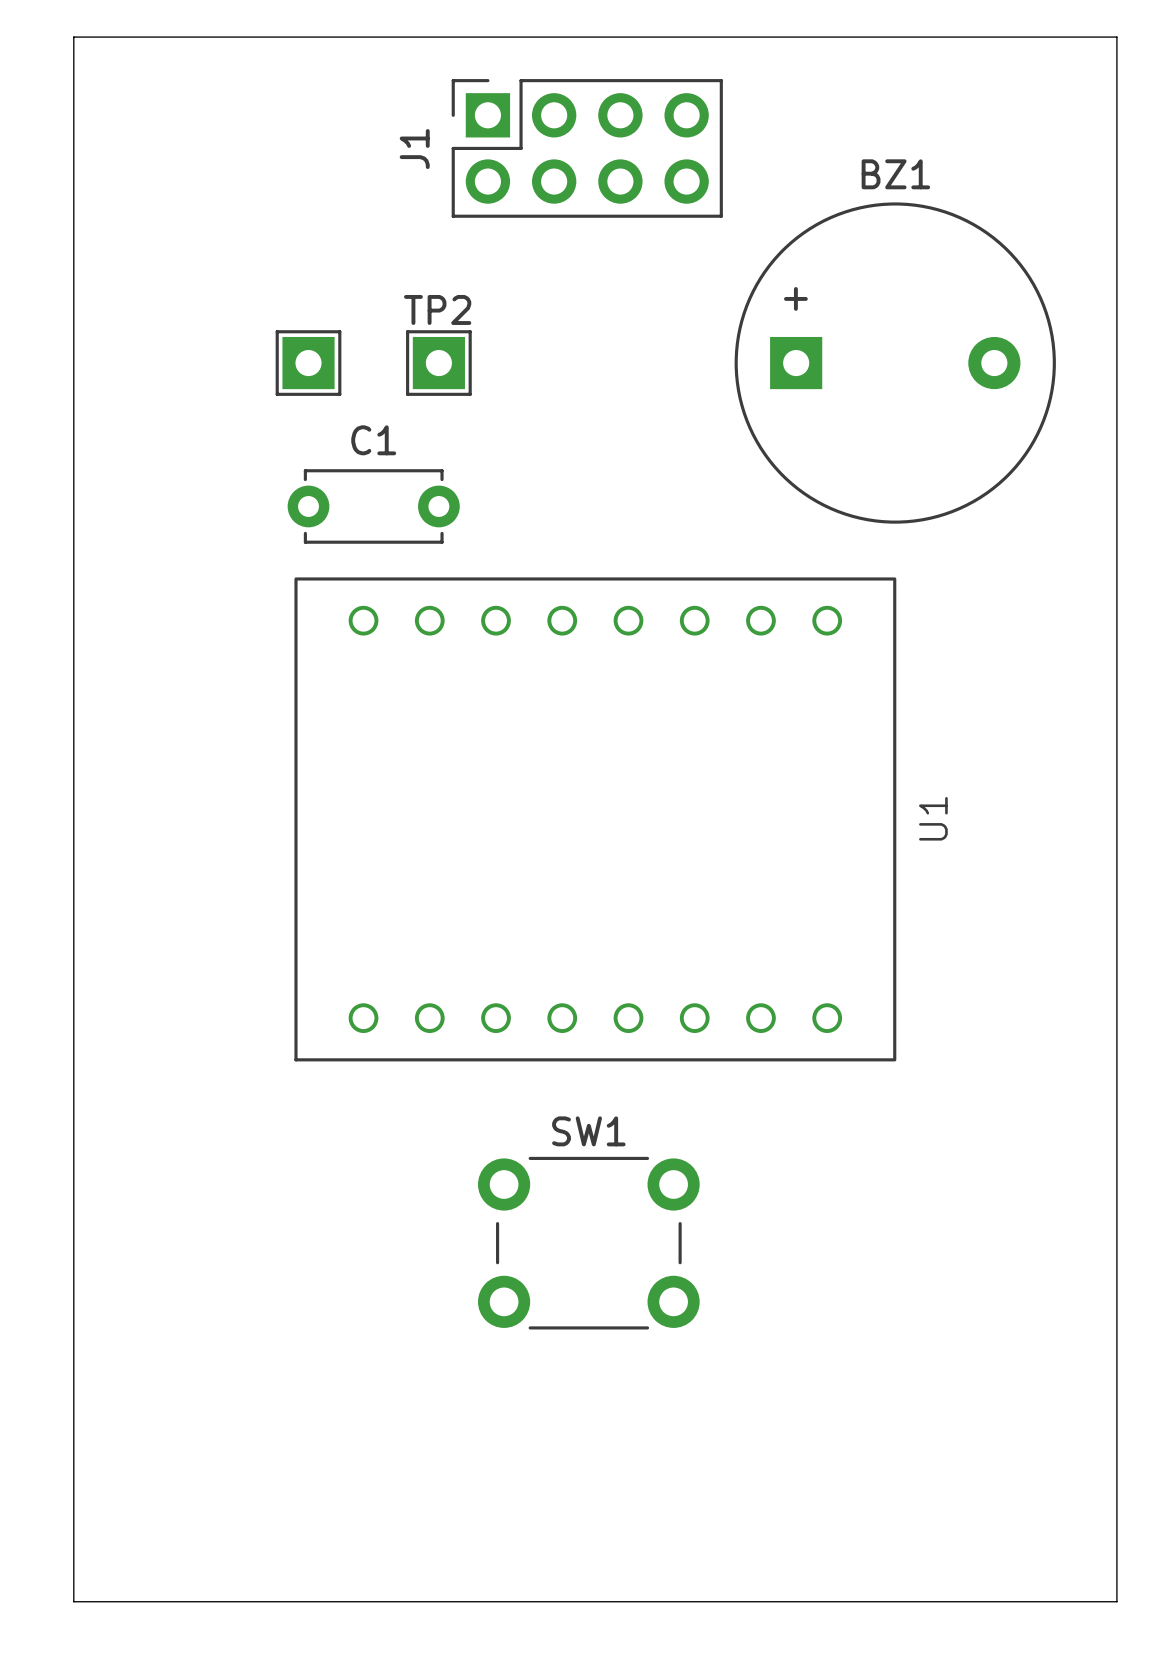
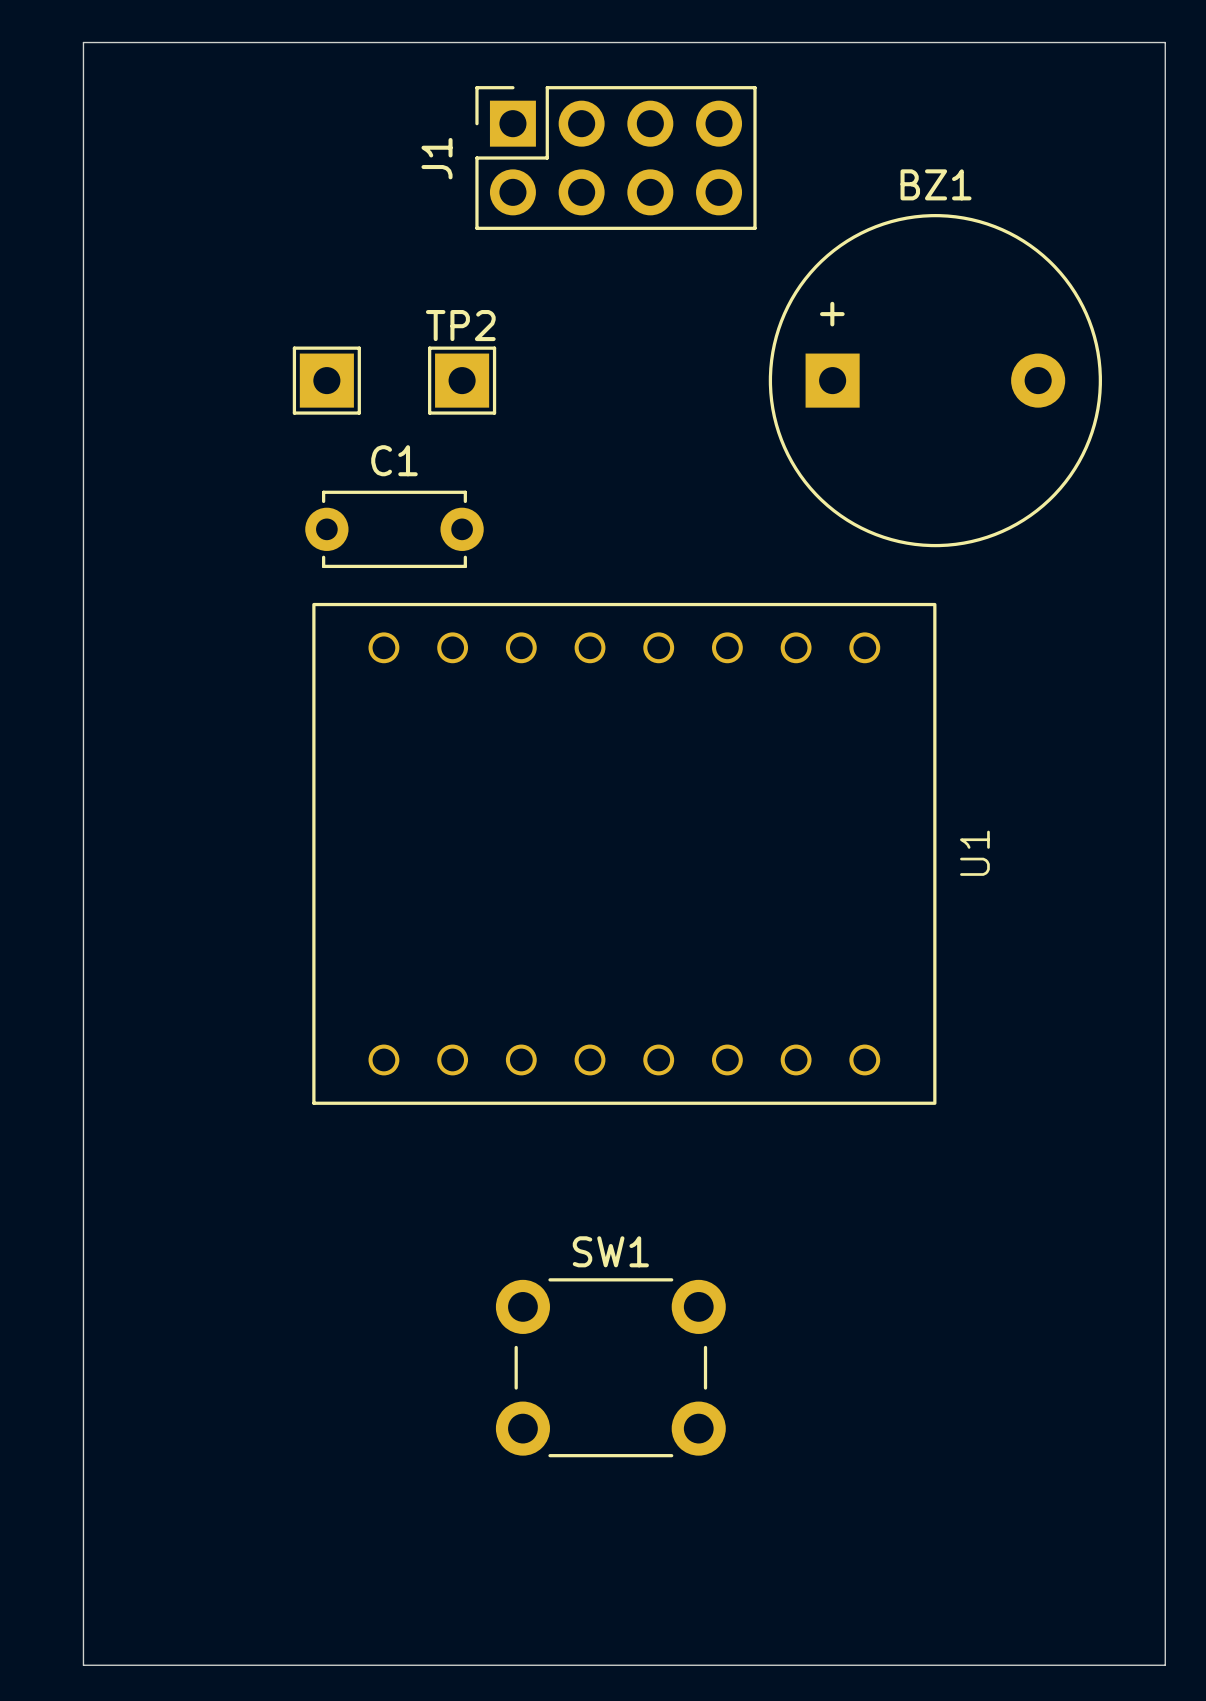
SW1 position: (588, 1243) -> (610, 1367)

